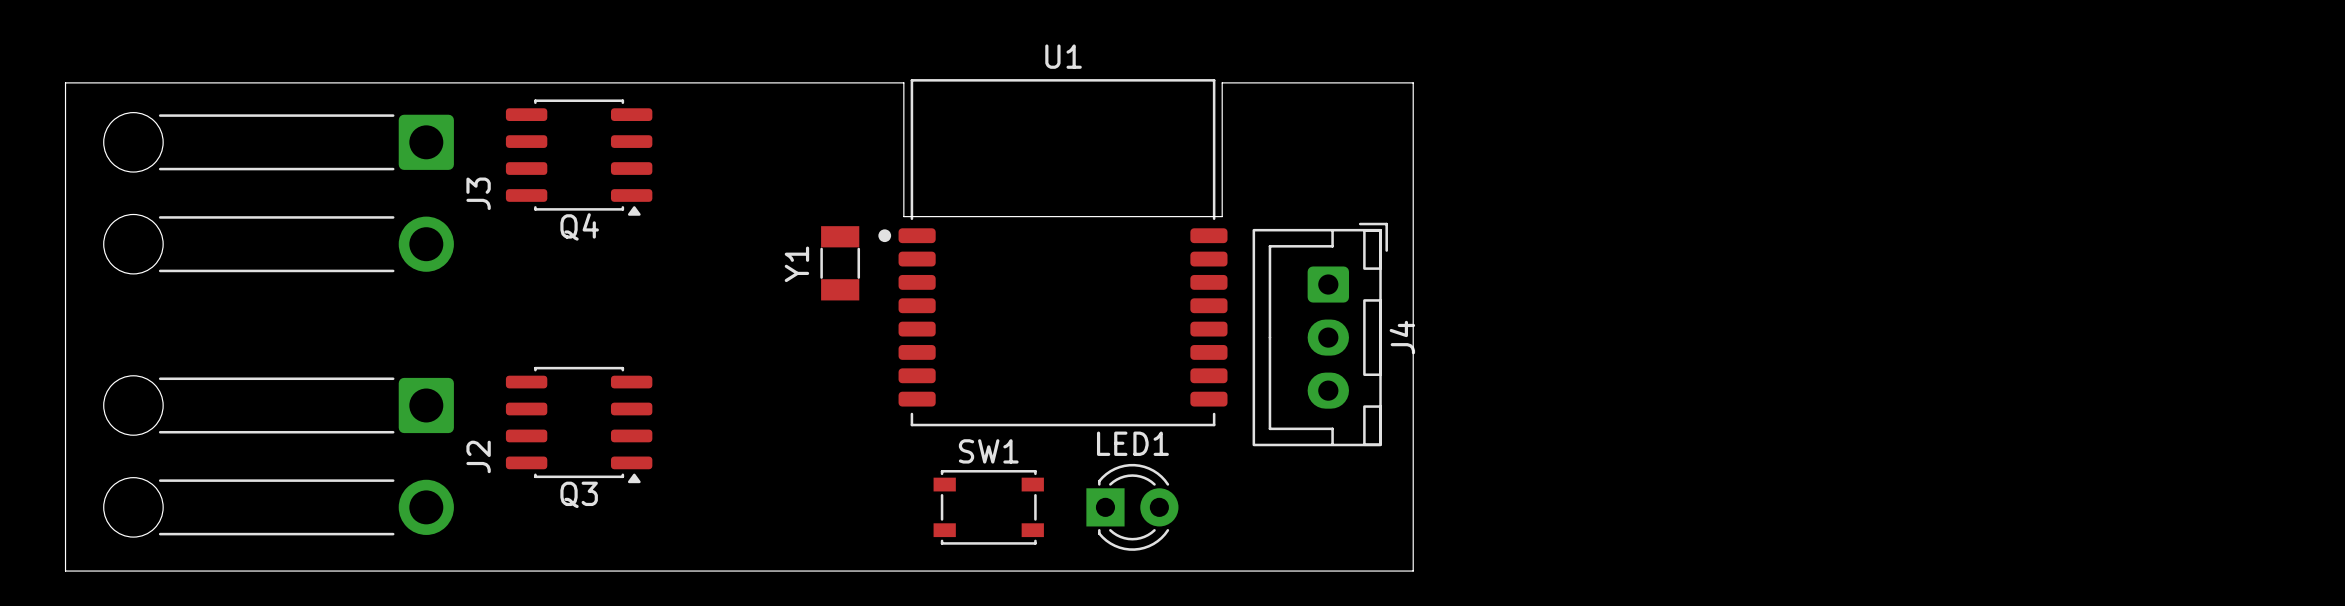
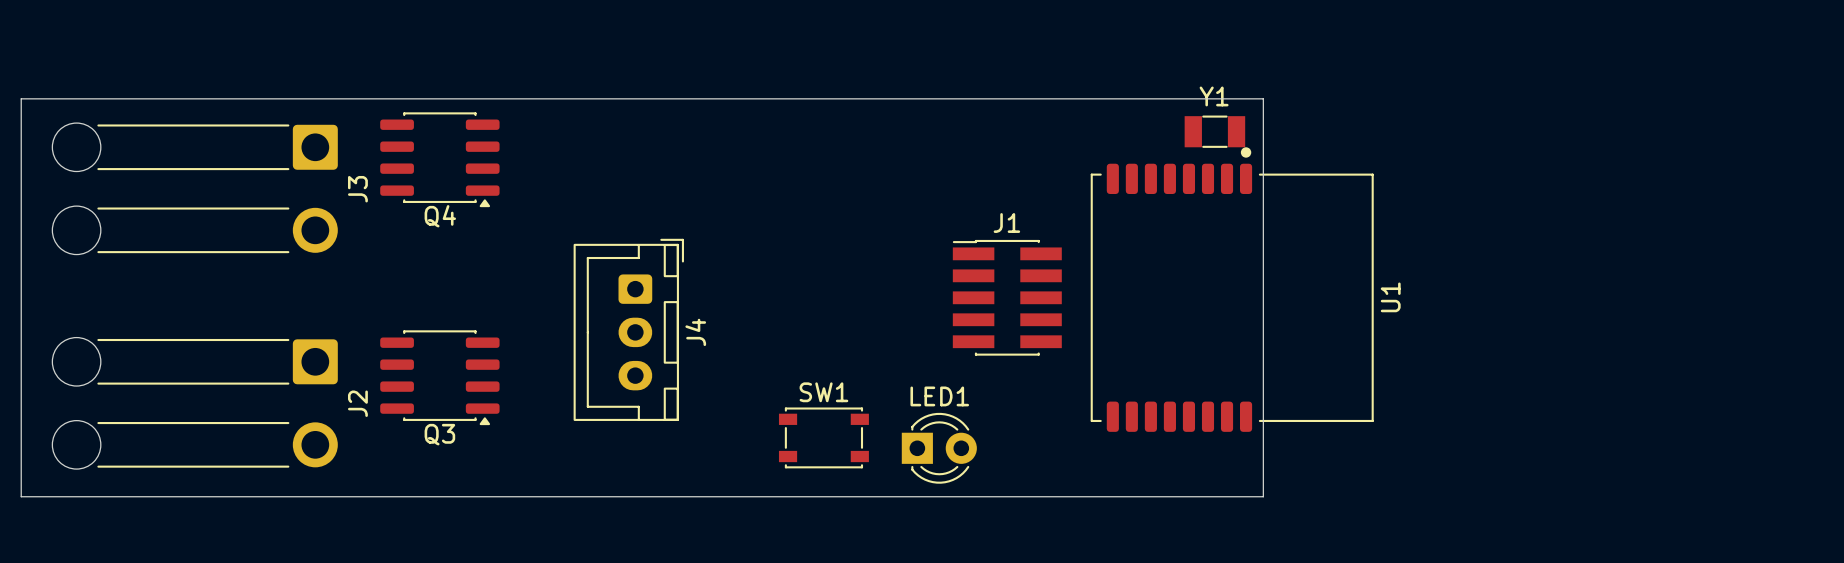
board edge: (903, 82) (903, 216) (1222, 216) (1222, 82) -> (704, 98) (964, 98)
board edge: (1413, 82) (1413, 571) -> (1119, 98) (1263, 98) (1263, 496) (1119, 496)
U1 rotation: 0° (1052, 252) -> 90° clockwise (1232, 289)
U1 position: (1052, 252) -> (1232, 289)
Y1 rotation: 0° (840, 263) -> 90° clockwise (1214, 131)
Y1 position: (840, 263) -> (1214, 131)
J1: none -> (1007, 297)
J4 position: (1320, 334) -> (628, 329)
SW1 position: (988, 507) -> (823, 437)
LED1 position: (1132, 507) -> (939, 448)

